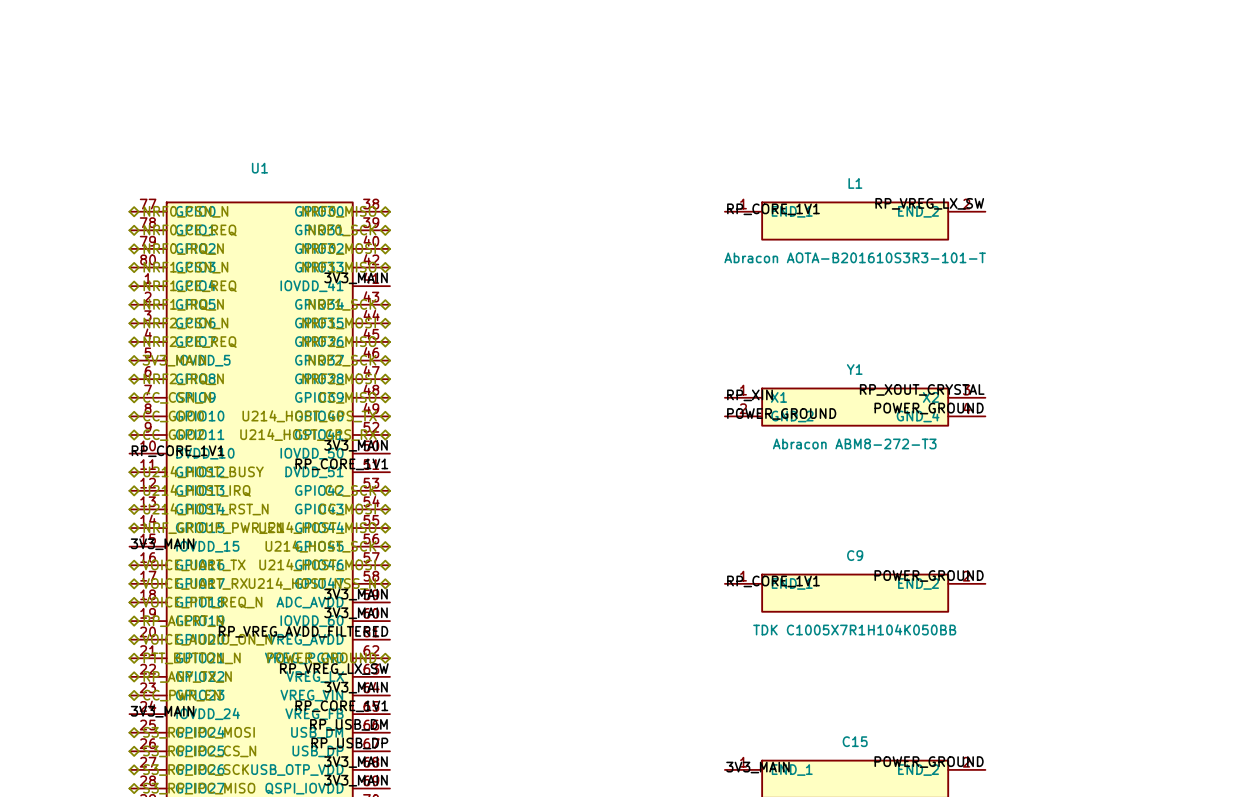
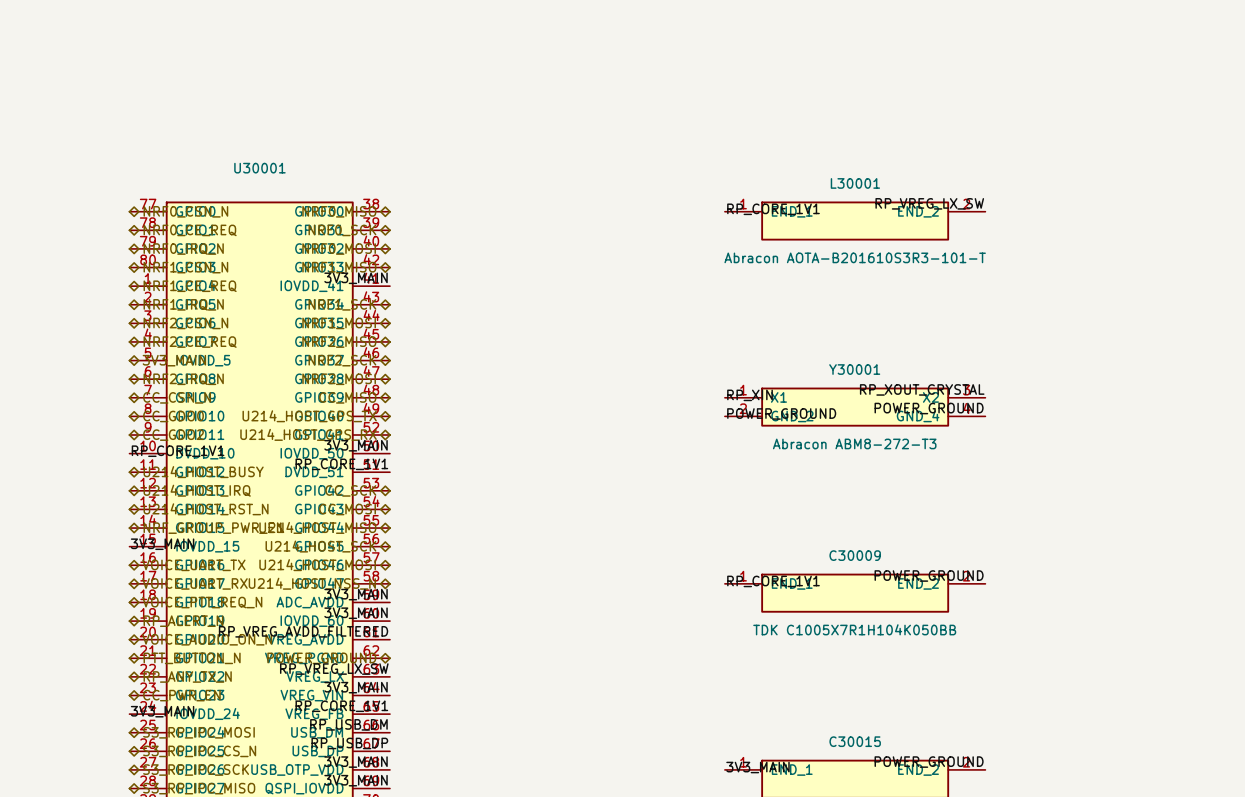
U1 name: U1 (259, 168) -> U30001 (259, 168)
L1 name: L1 (855, 183) -> L30001 (855, 183)
Y1 name: Y1 (854, 369) -> Y30001 (854, 369)
C9 name: C9 (855, 555) -> C30009 (855, 555)
C15 name: C15 (855, 741) -> C30015 (855, 741)

